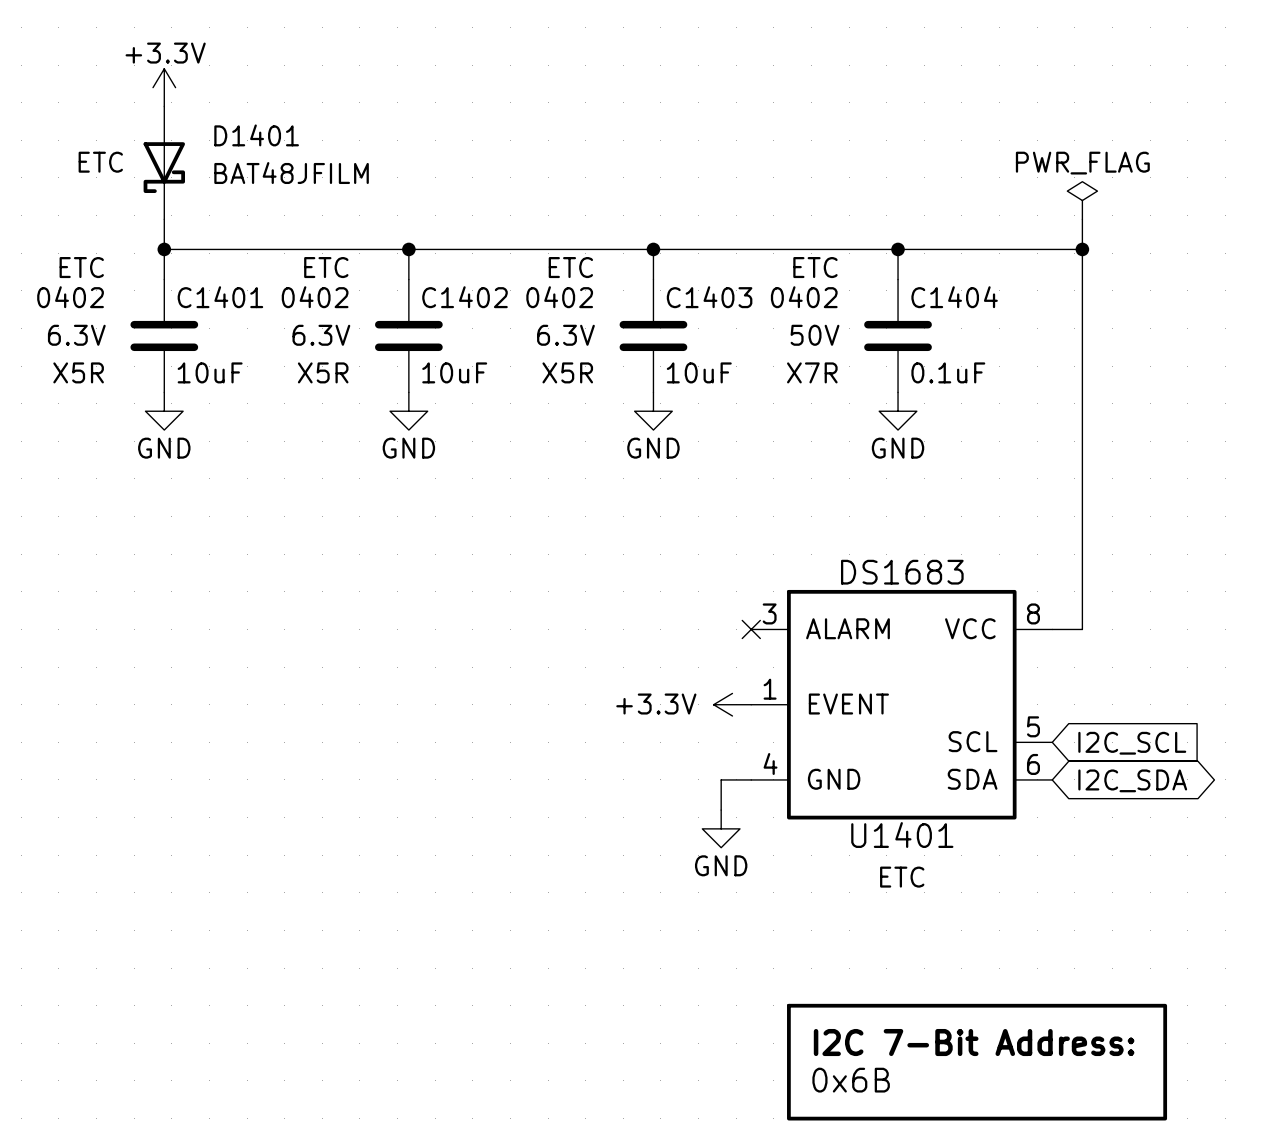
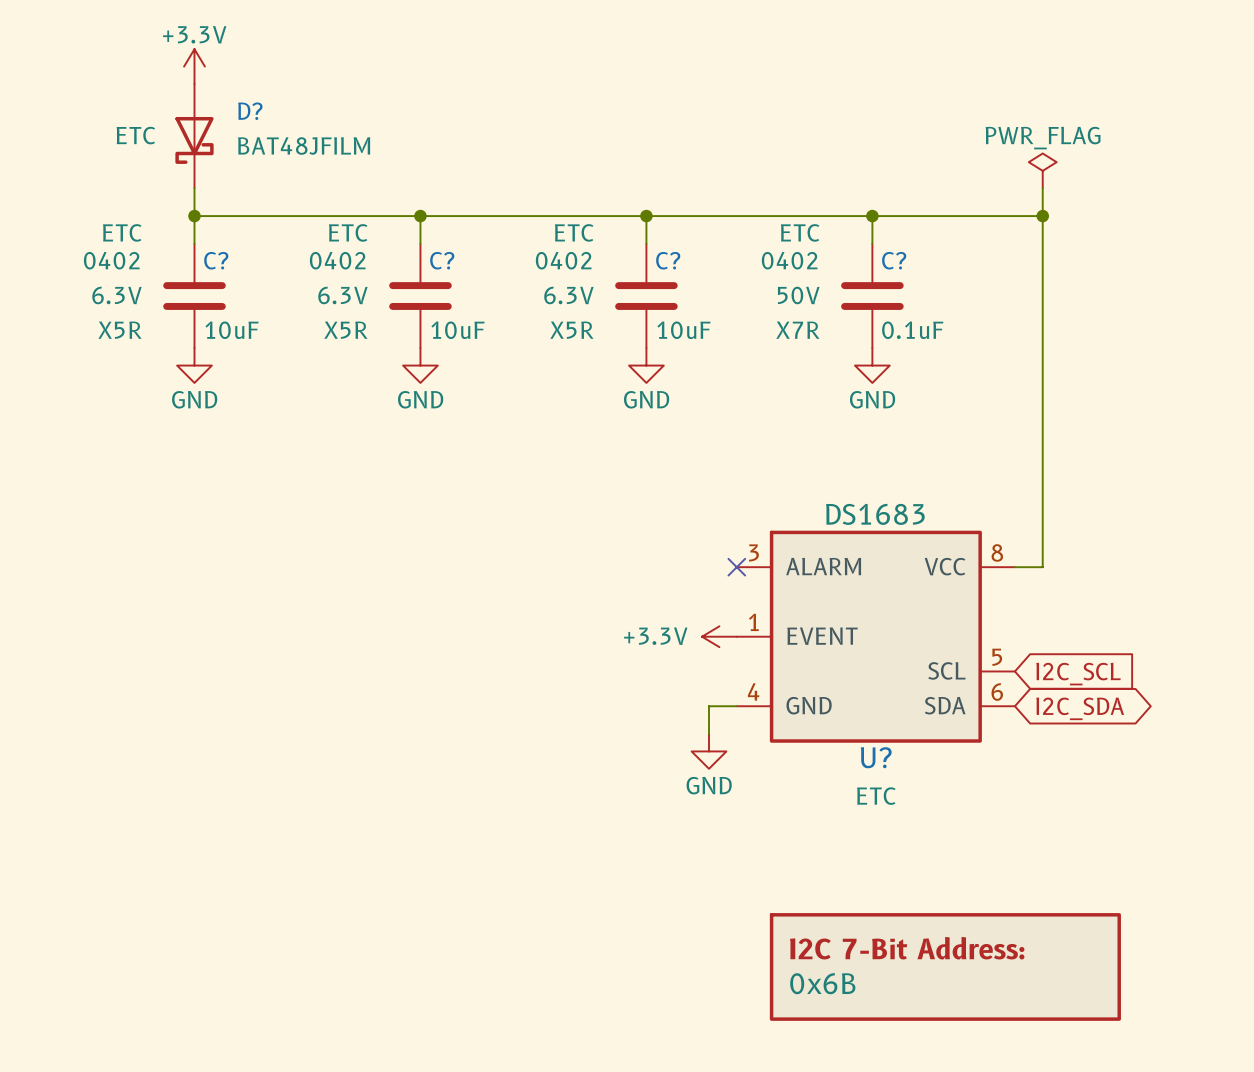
D1401 name: D1401 (256, 135) -> D? (250, 111)
C1401 name: C1401 (220, 297) -> C? (216, 260)
C1402 name: C1402 (465, 297) -> C? (442, 260)
C1403 name: C1403 (709, 297) -> C? (668, 260)
C1404 name: C1404 (954, 297) -> C? (894, 260)
U1401 name: U1401 (902, 835) -> U? (876, 757)

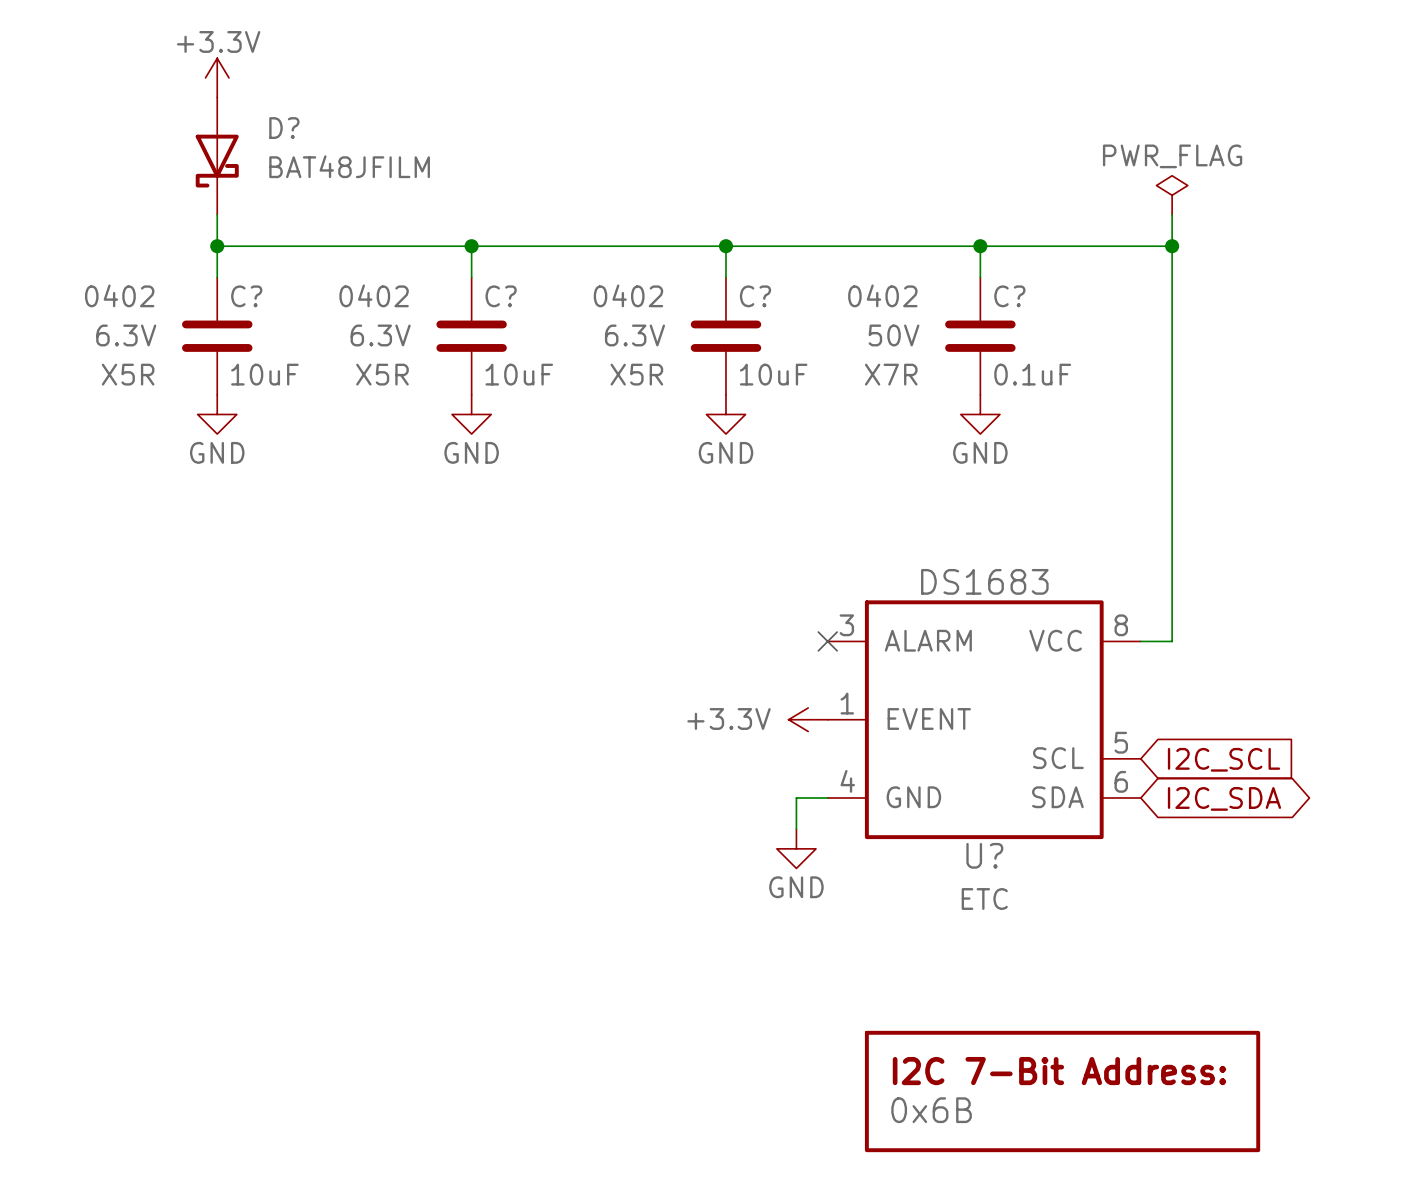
D? text: ETC (135, 135) -> none
C? text: ETC (122, 232) -> none
C? text: ETC (348, 232) -> none
C? text: ETC (574, 232) -> none
C? text: ETC (800, 232) -> none

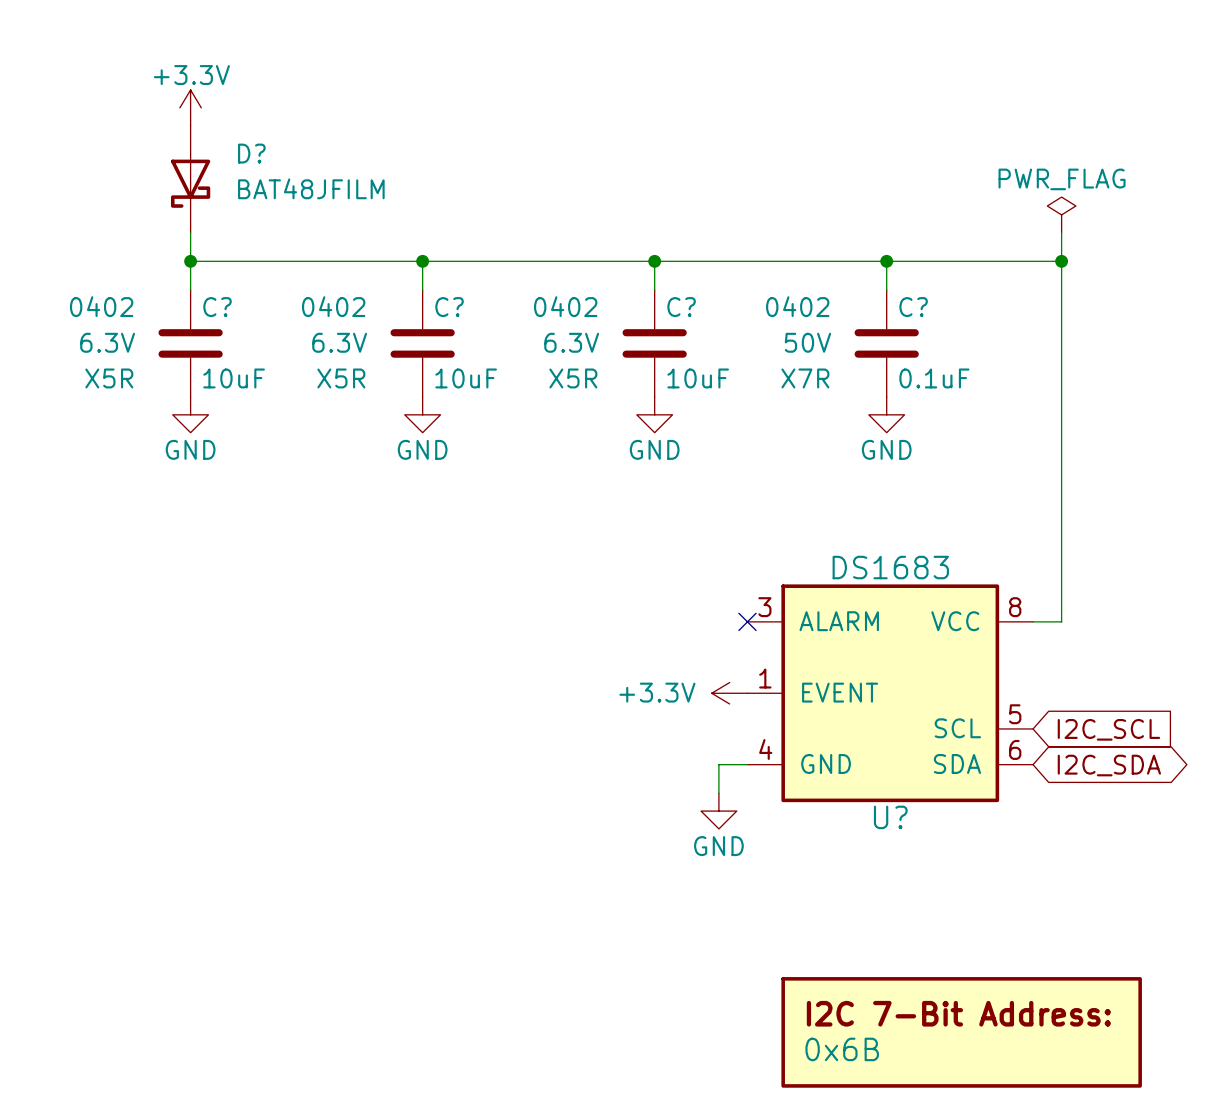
U? text: ETC (984, 899) -> none

